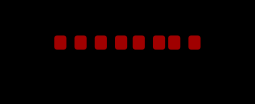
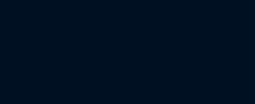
part: (70, 42) -> none
part: (110, 42) -> none
part: (148, 42) -> none
part: (184, 42) -> none

